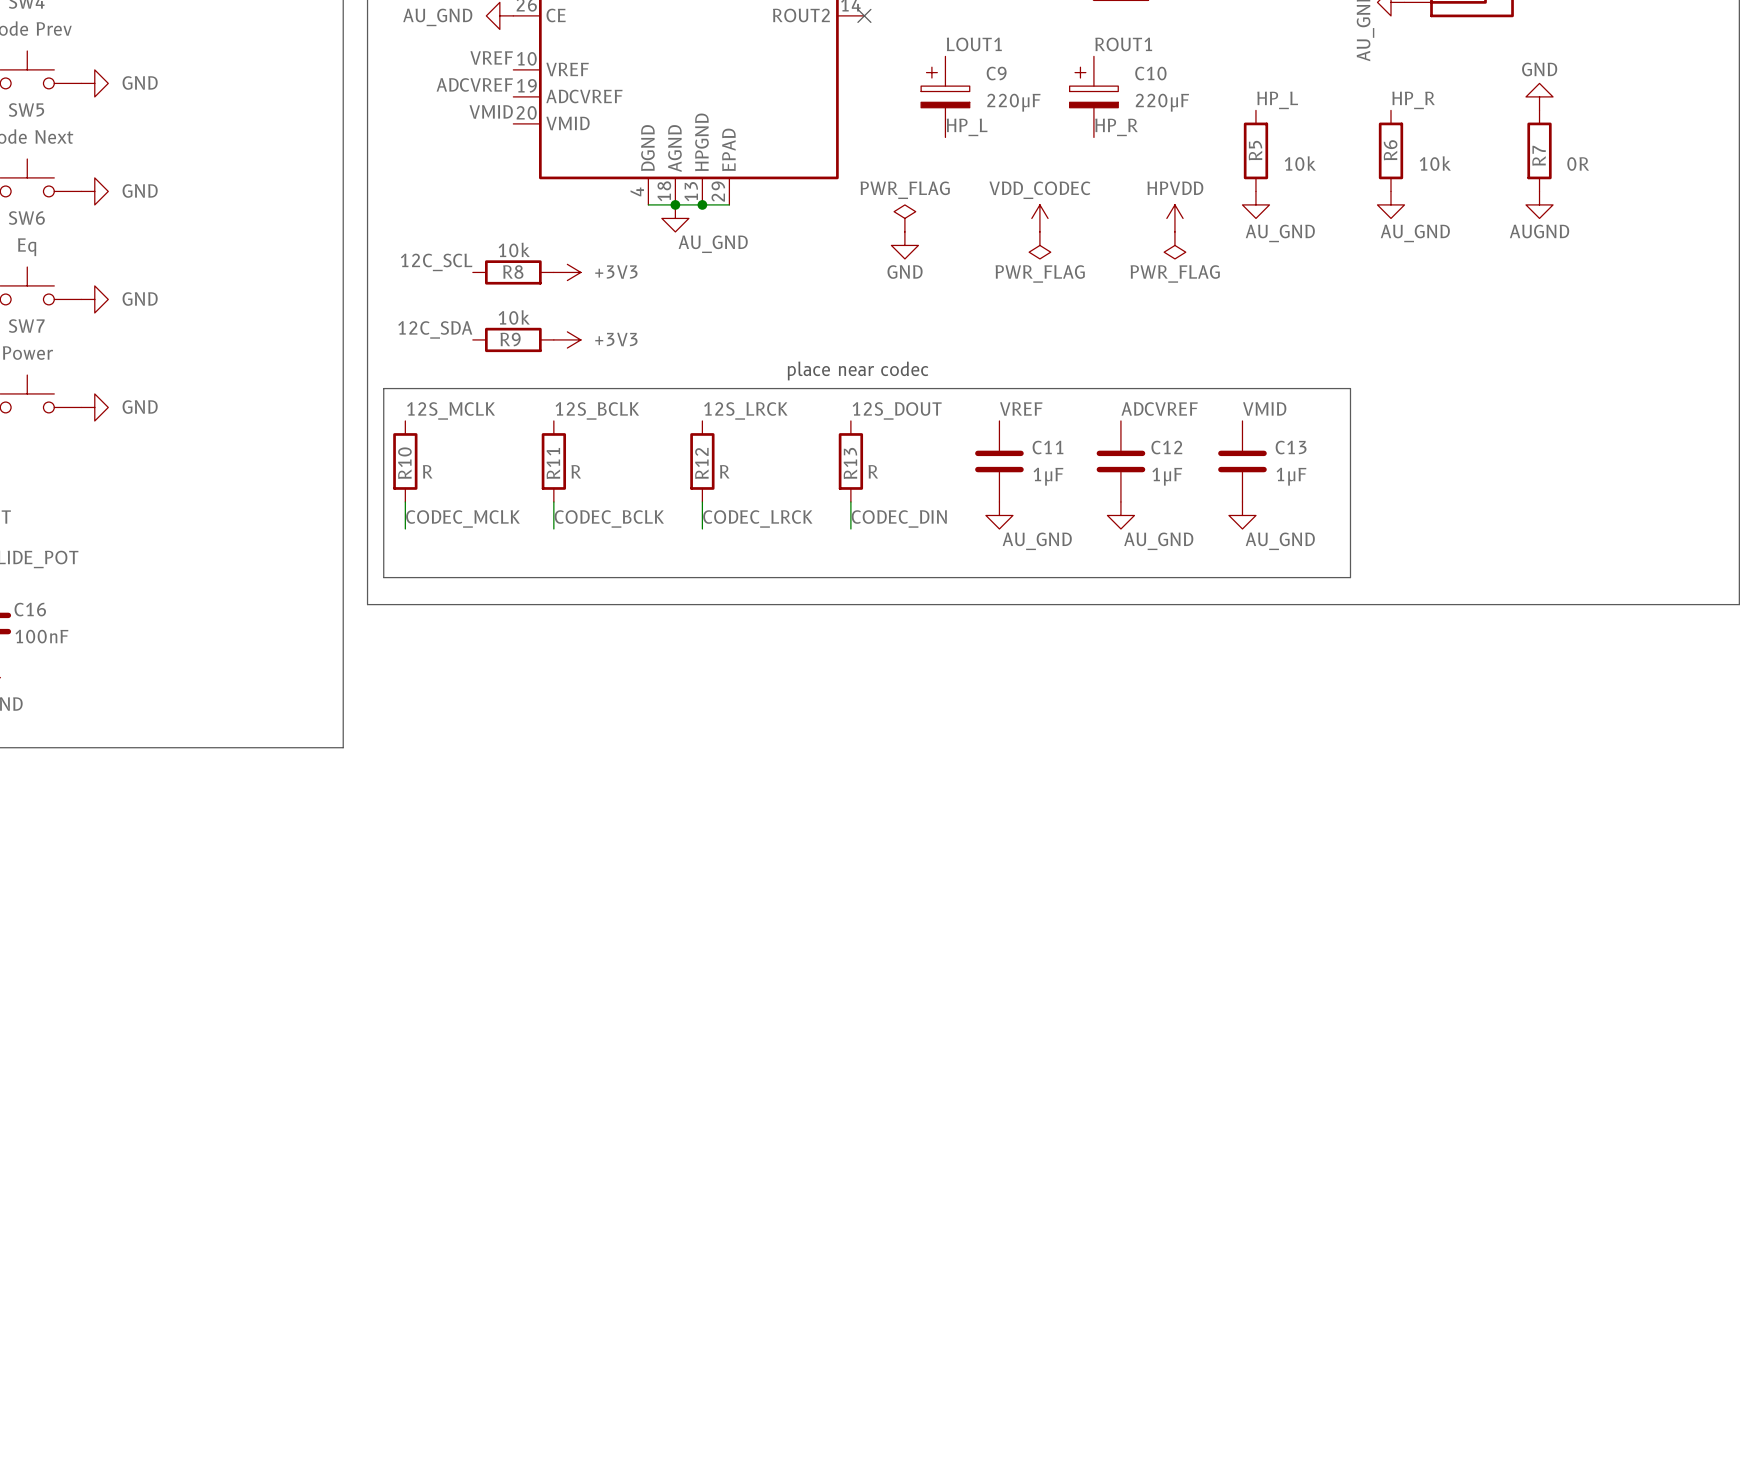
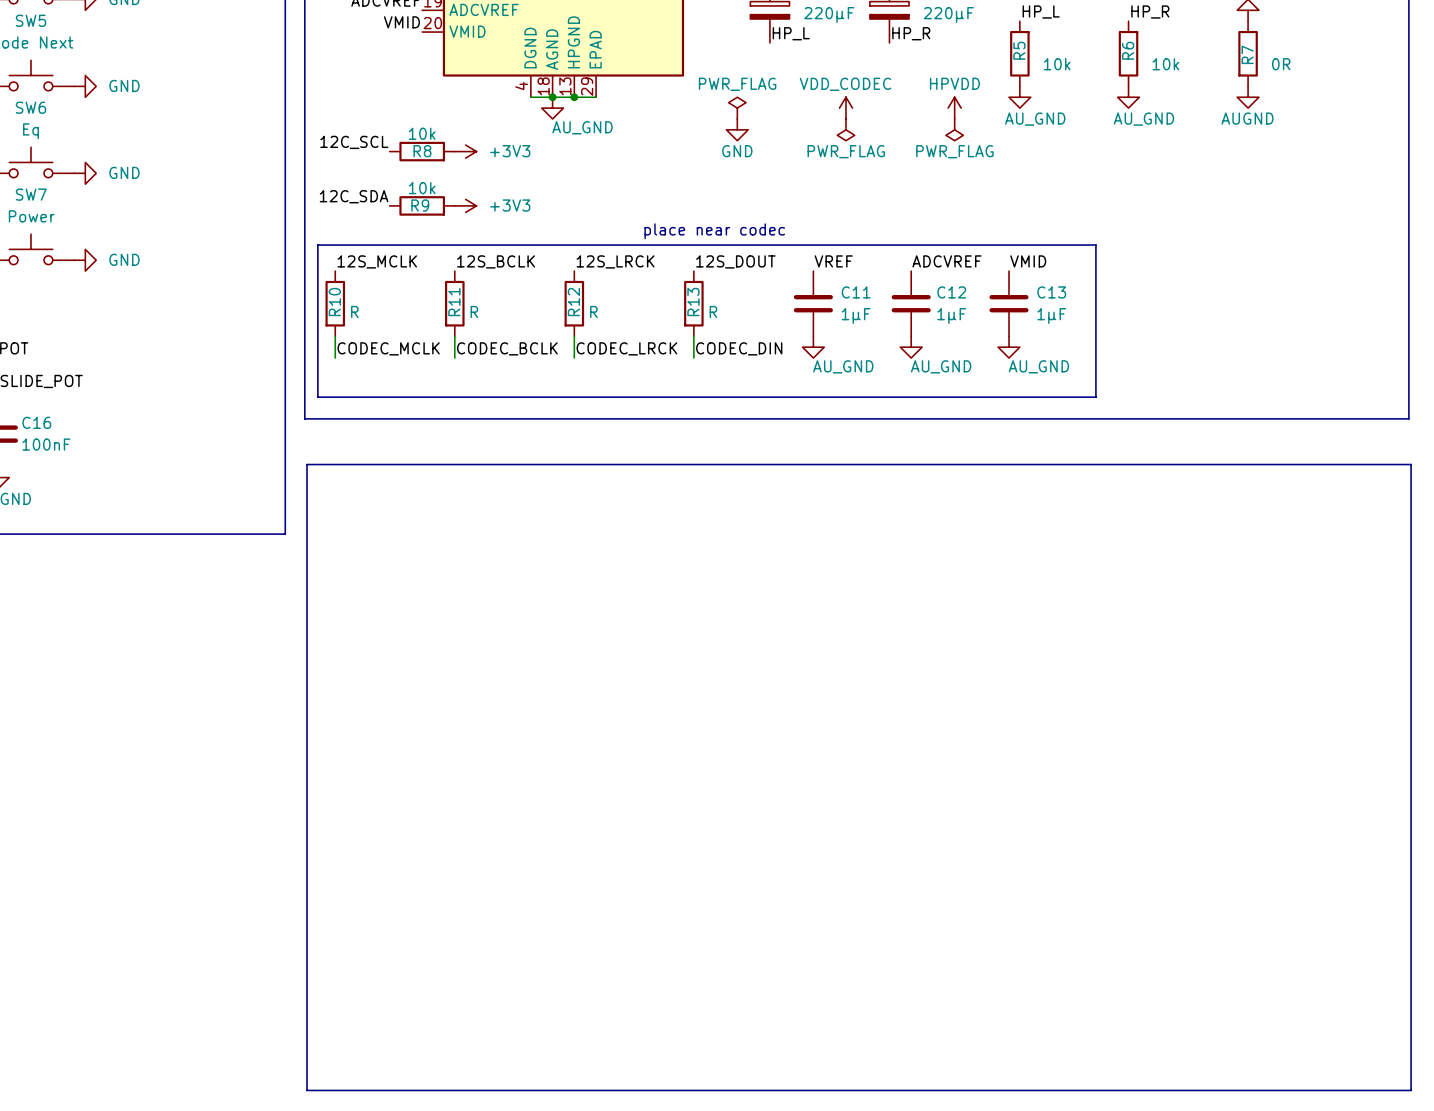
line: none -> (307, 464) (1411, 464) (1411, 1090) (307, 1090) (307, 464)

